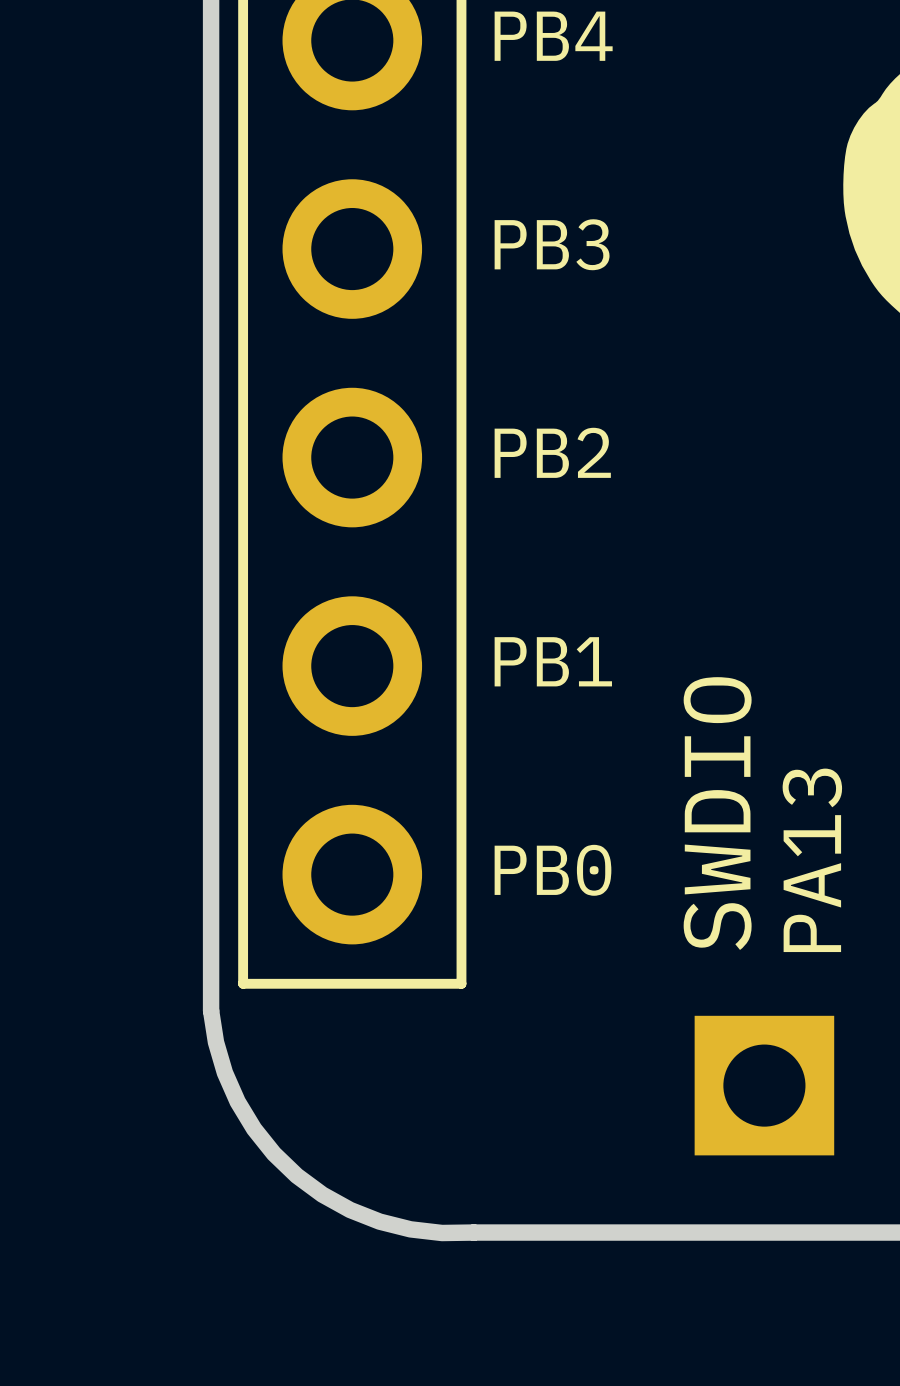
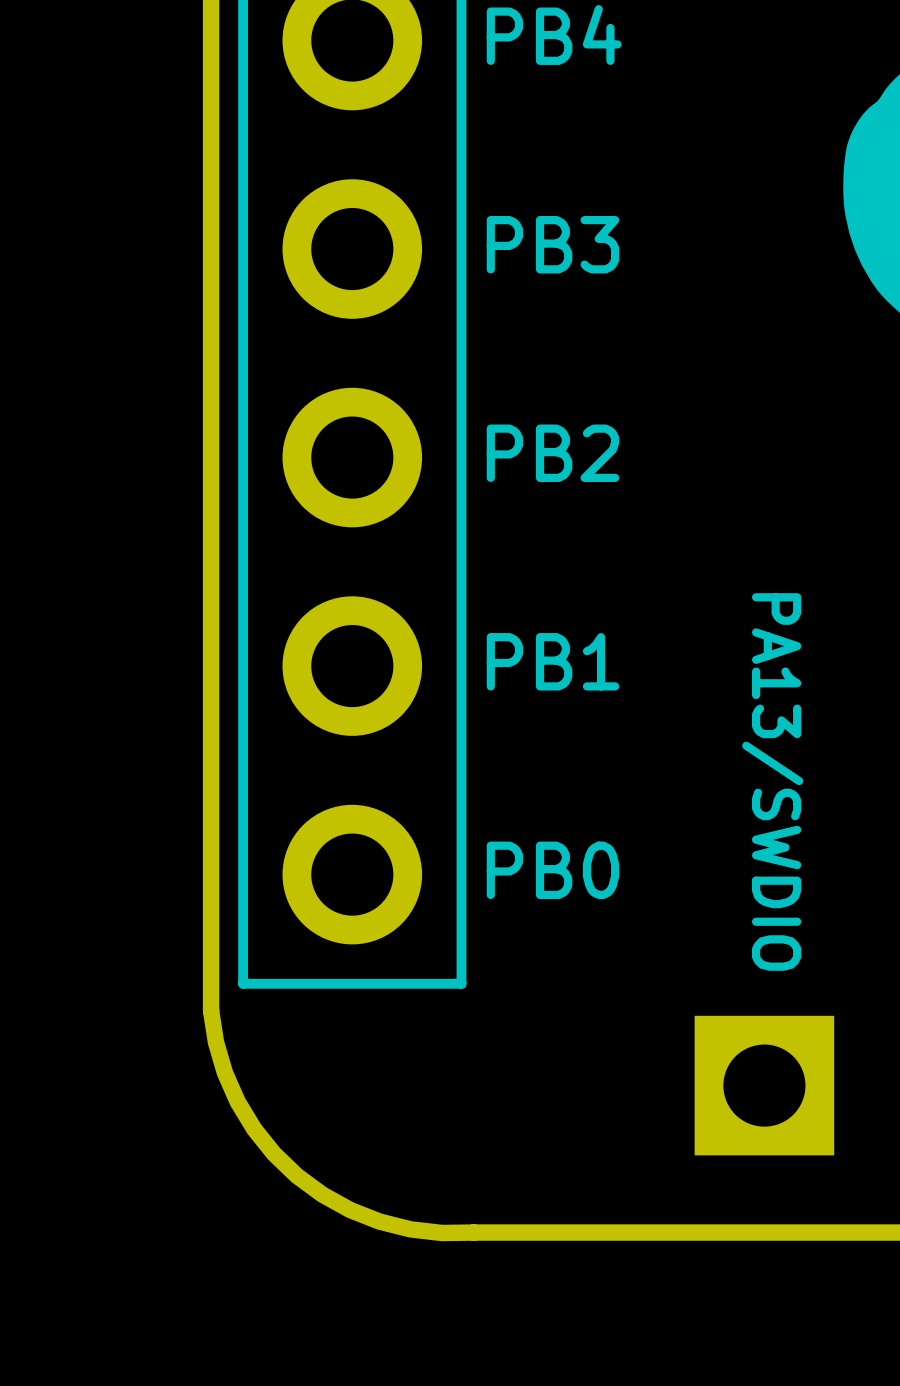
text: SWDIO (717, 813) -> PA13/SWDIO (772, 782)
text: PA13 (812, 860) -> none

